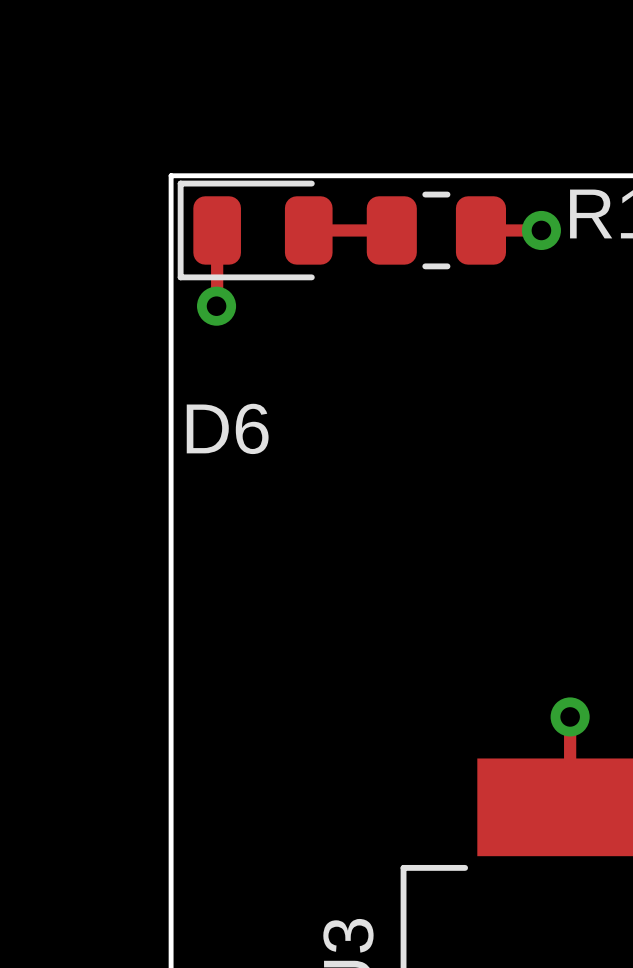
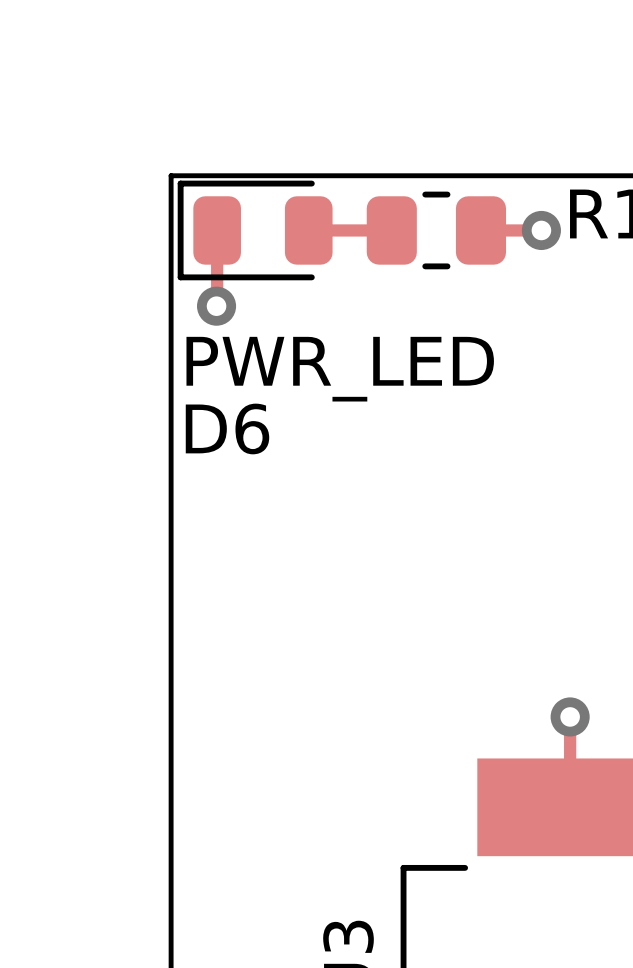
text: none -> PWR_LED (340, 369)

